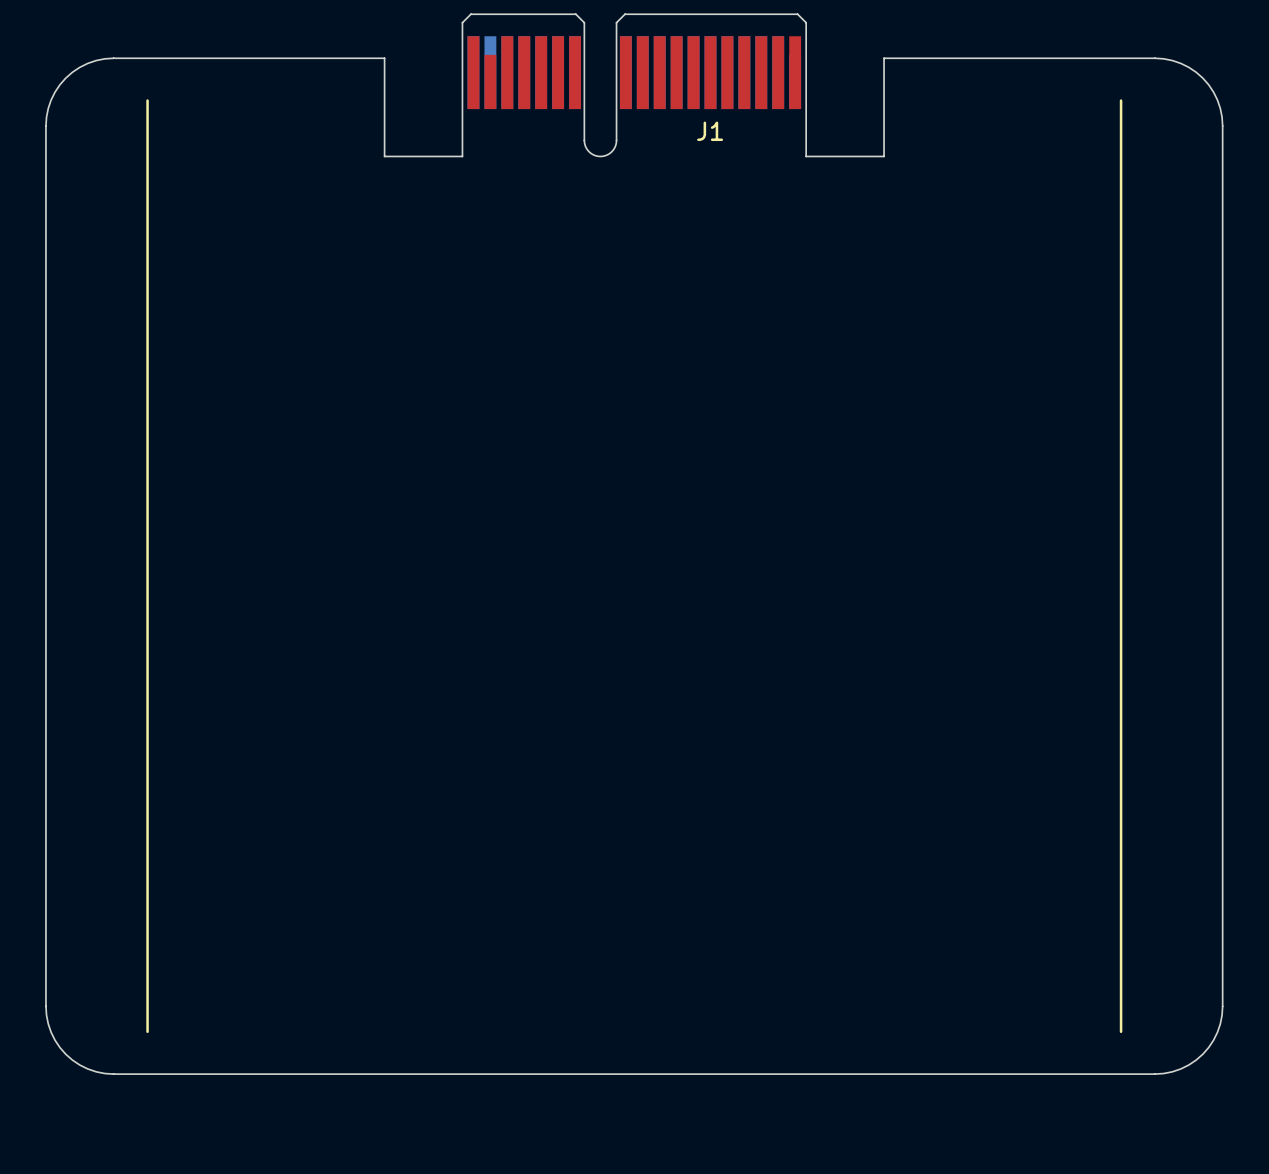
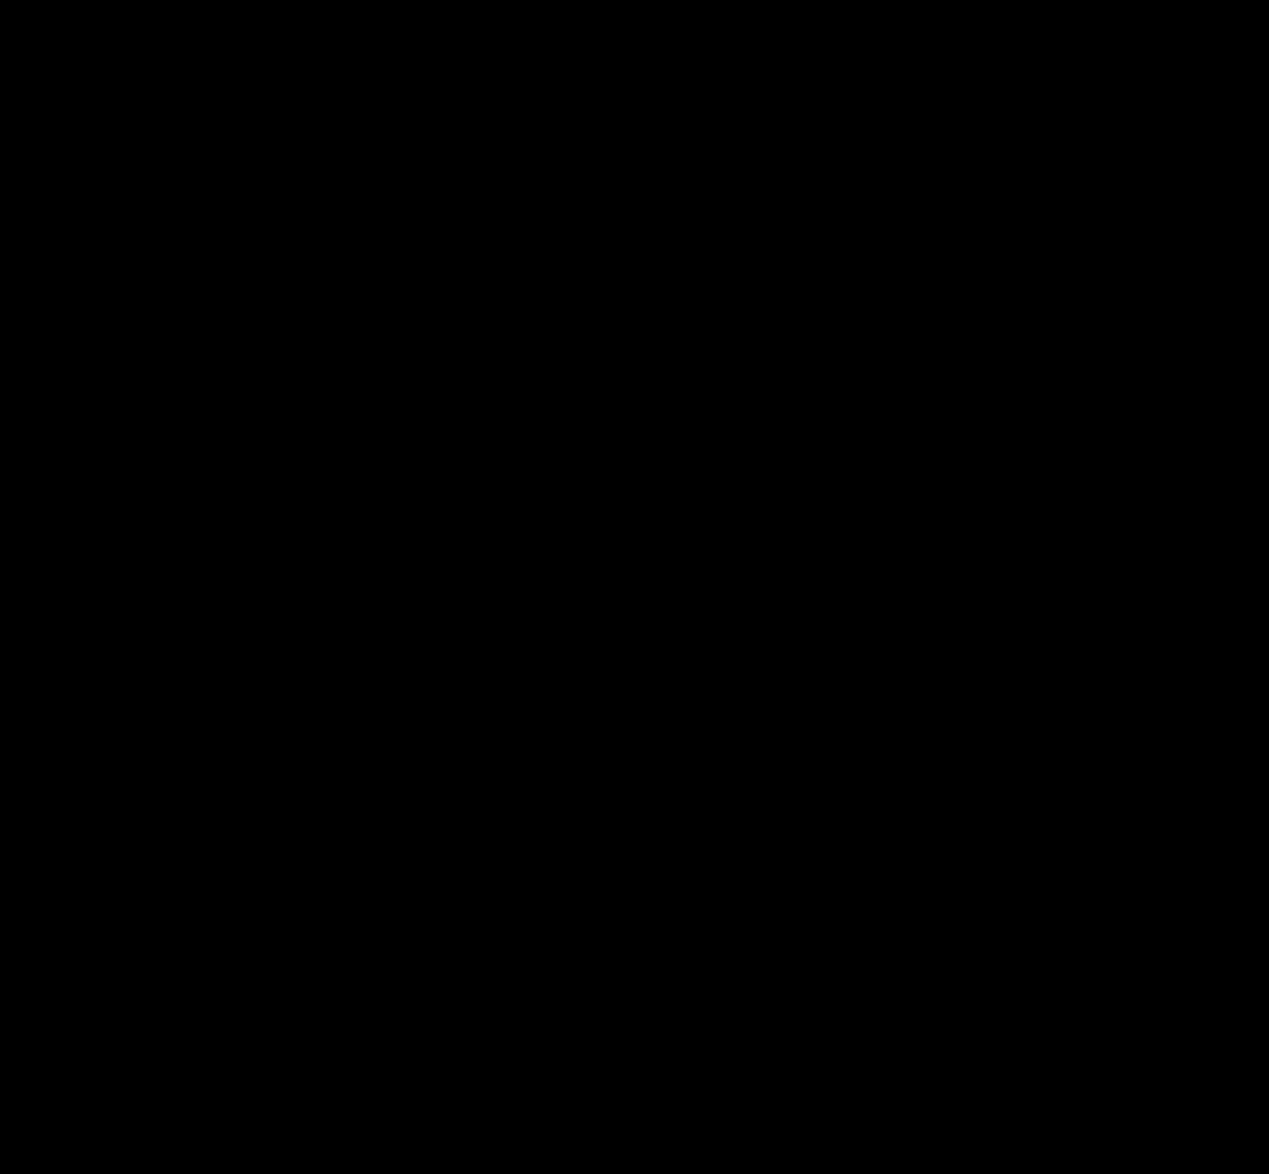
J1: (634, 85) -> none
line: (147, 100) (147, 1031) -> none
line: (1121, 100) (1121, 1031) -> none
board edge: (462, 156) (384, 156) (384, 58) (104, 58) (87, 63) (72, 72) (59, 84) (51, 100) (45, 125) (45, 1006) (51, 1032) (59, 1047) (79, 1065) (96, 1071) (113, 1074) (1154, 1074) (1180, 1068) (1202, 1054) (1213, 1040) (1220, 1023) (1222, 1006) (1222, 125) (1217, 100) (1208, 84) (1196, 72) (1180, 63) (1163, 58) (884, 58) (884, 156) (806, 156) -> none

